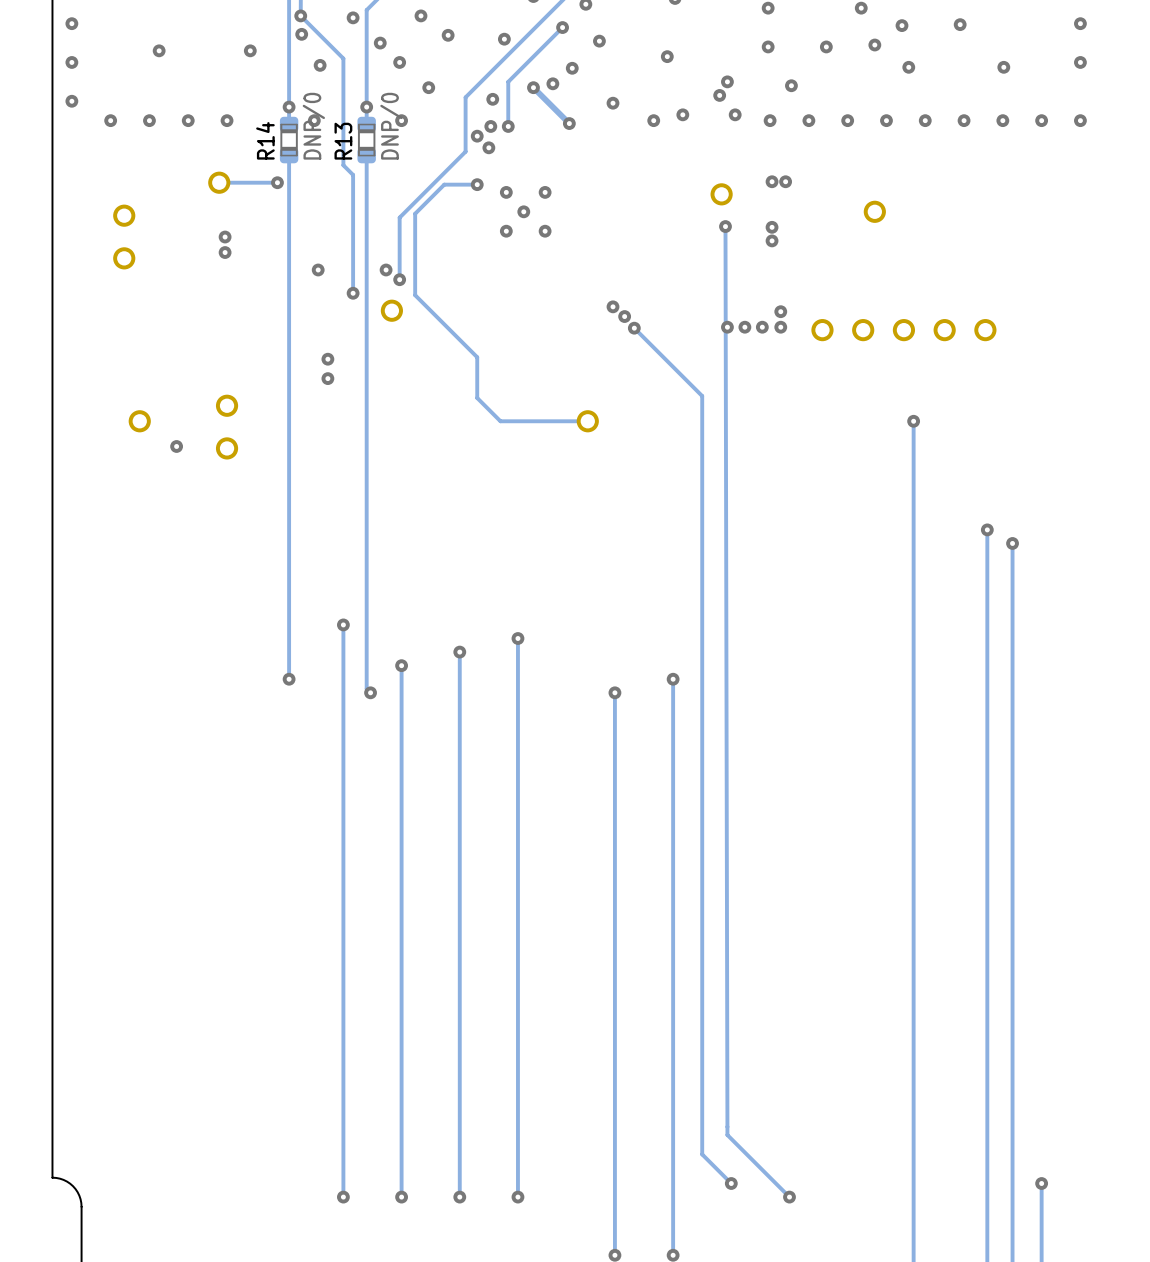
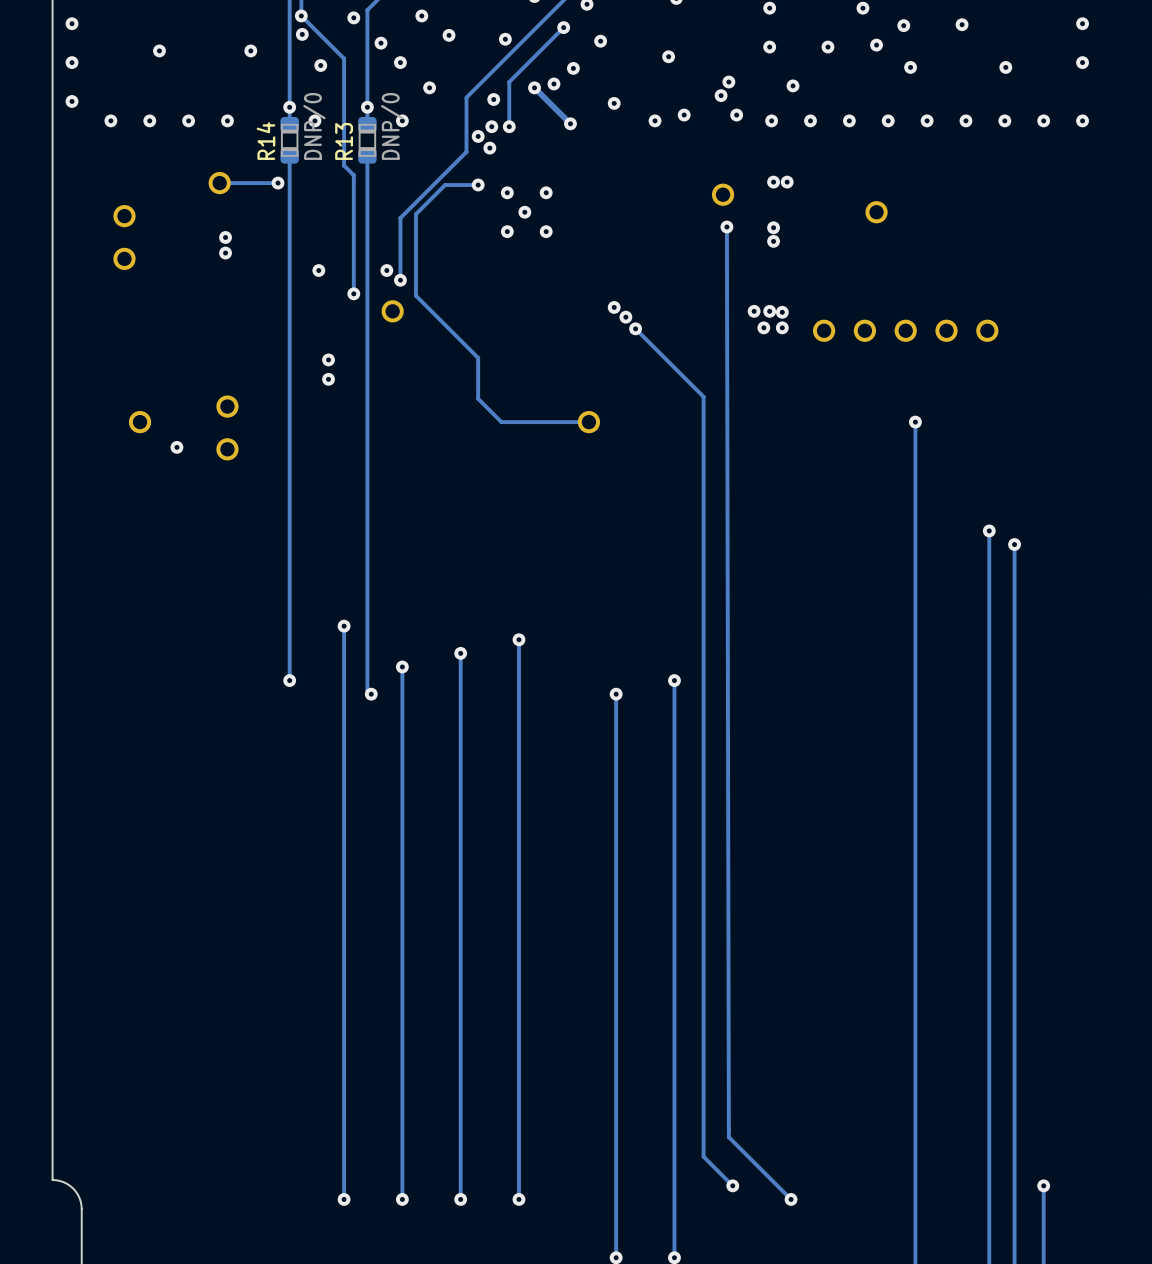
via: none -> (754, 311)
via: none -> (769, 311)
via: (727, 327) -> none
via: (744, 327) -> none

